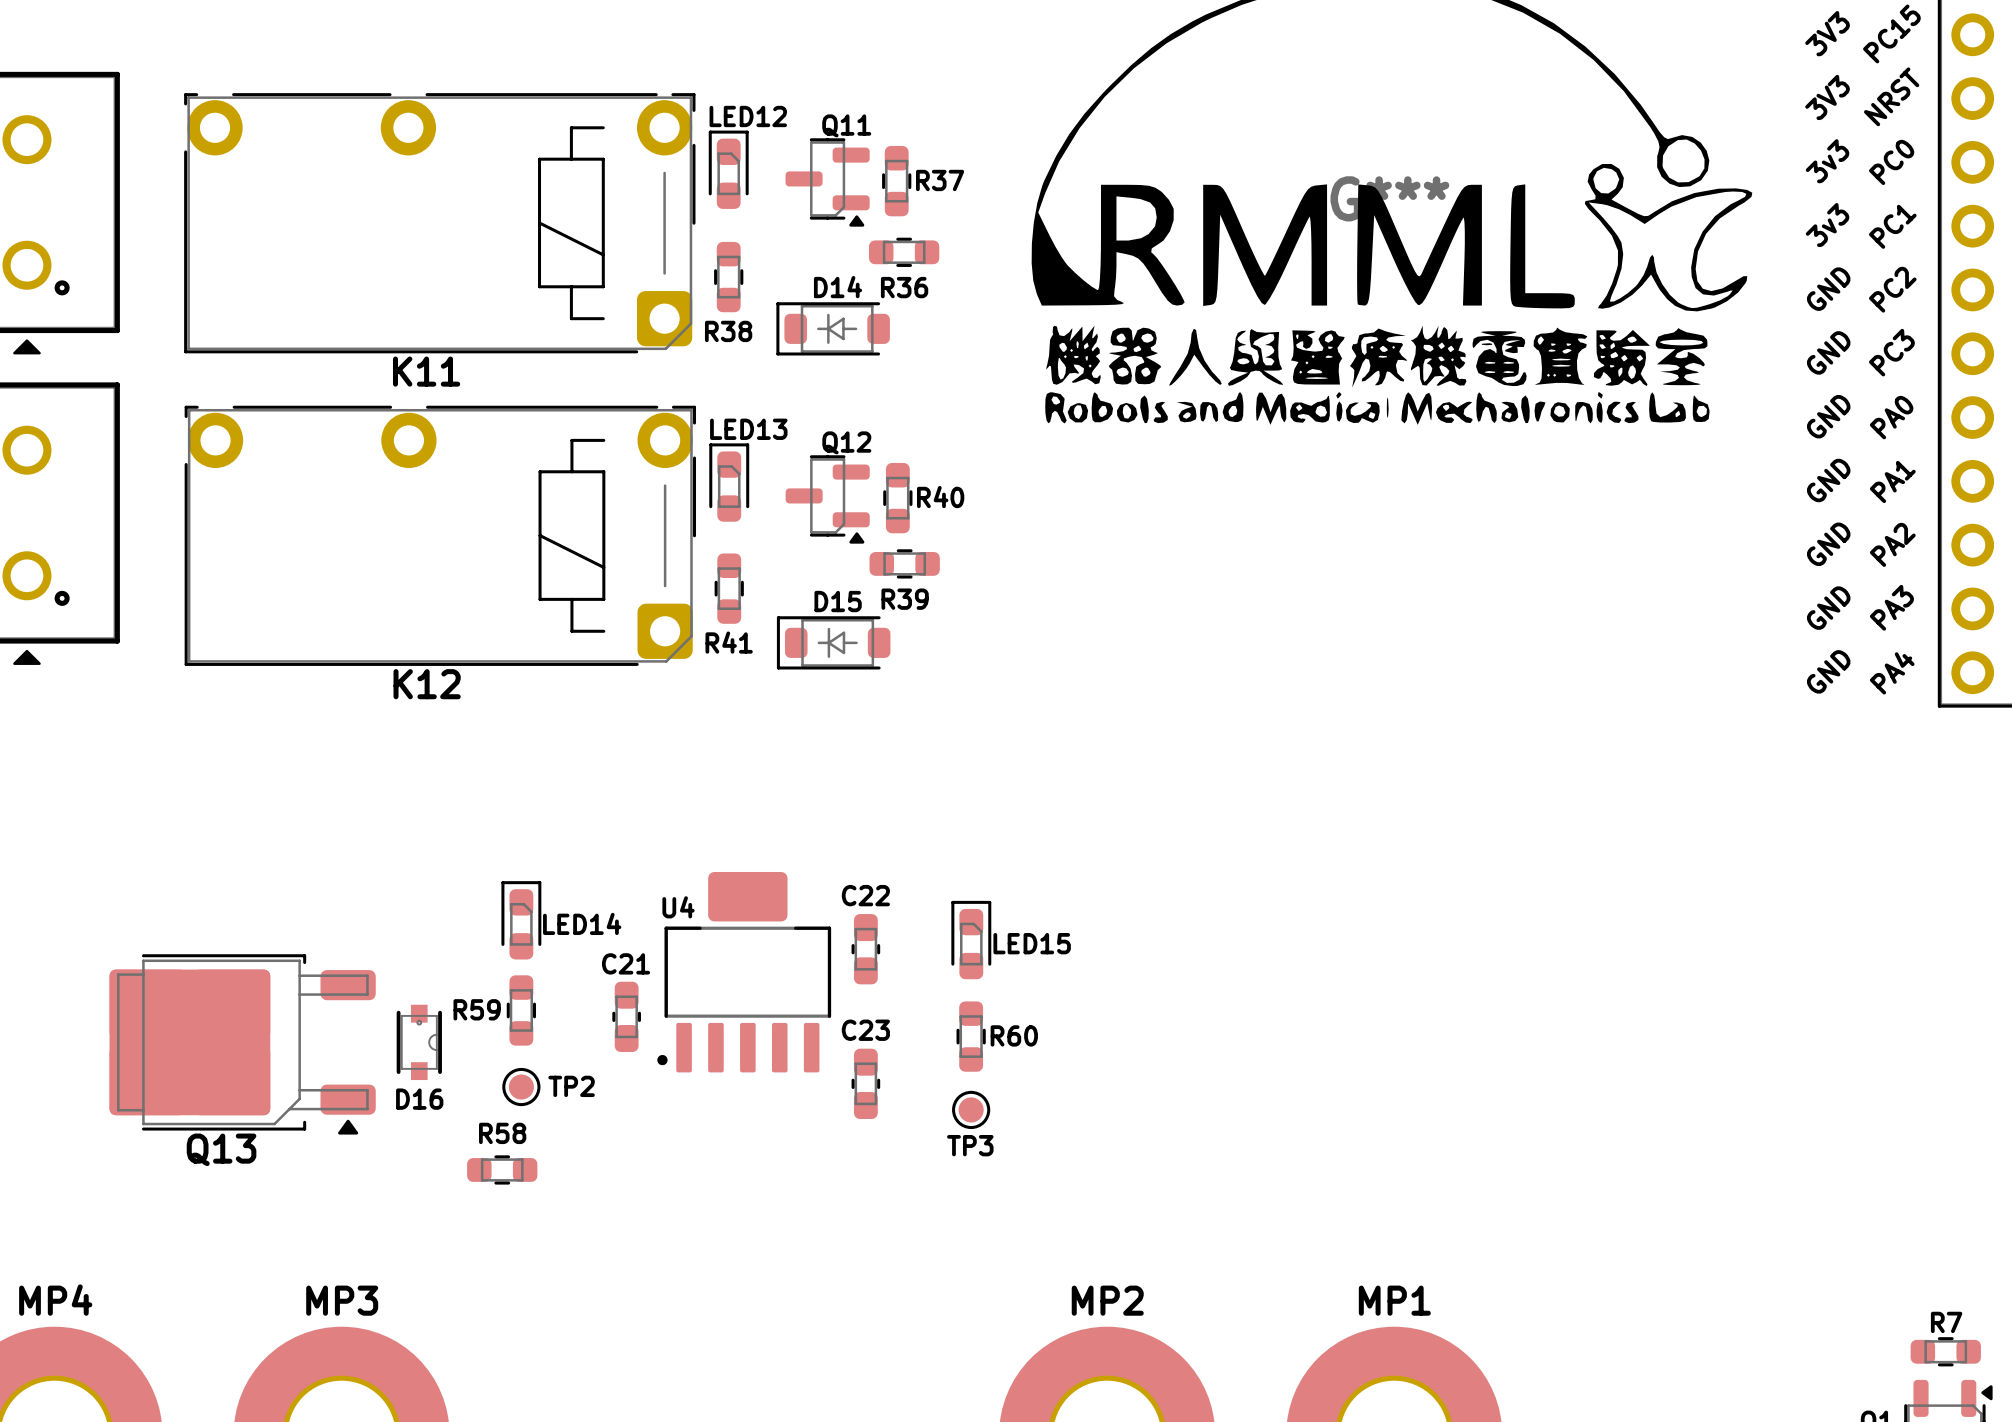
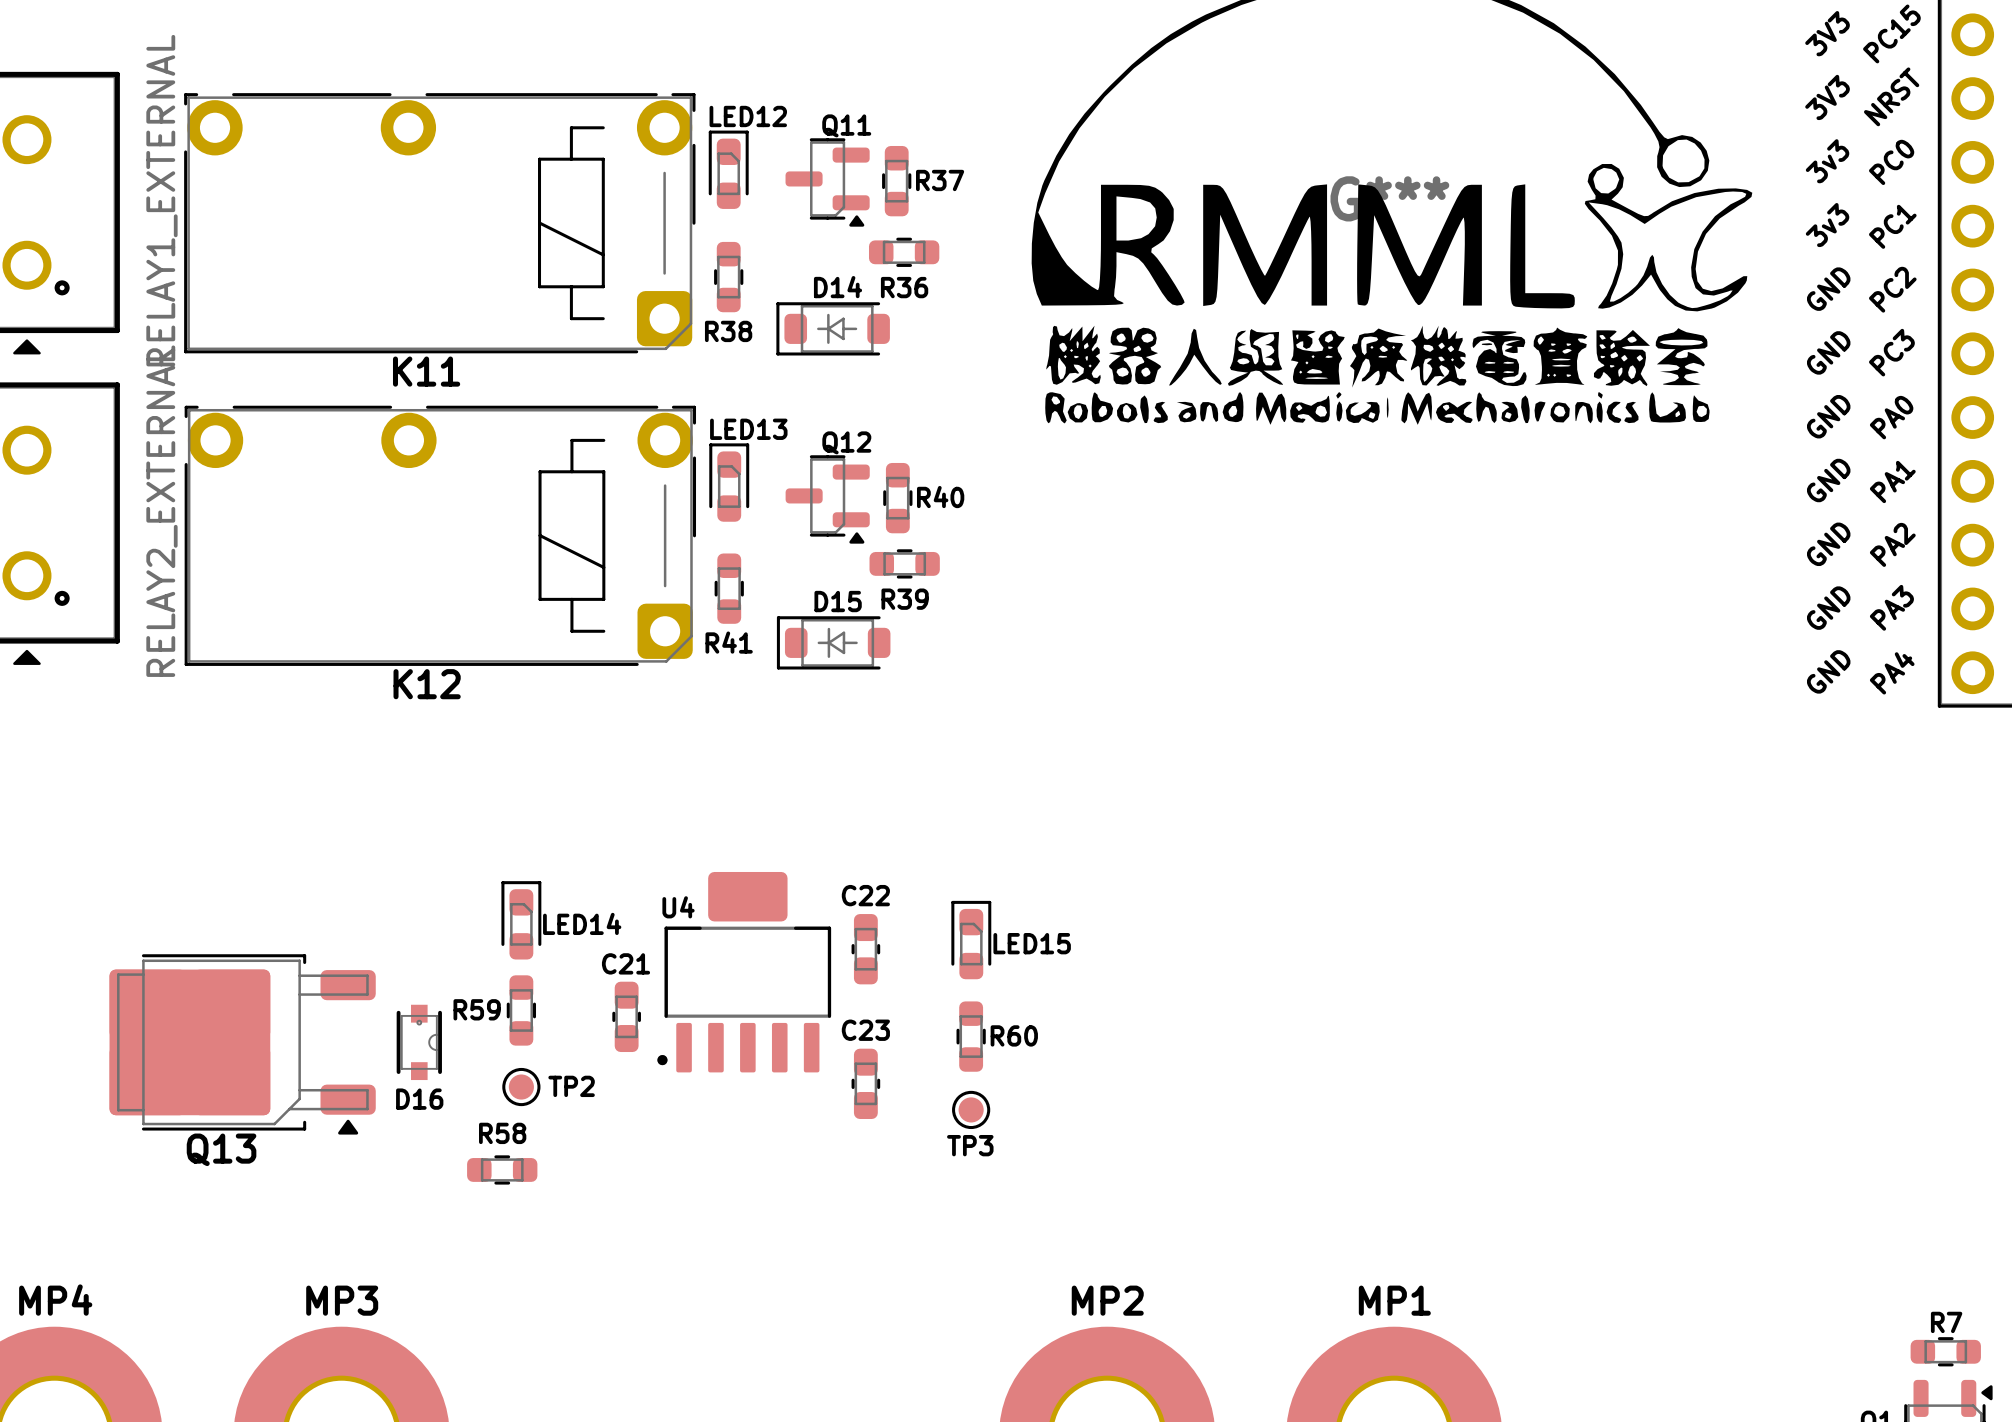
part value: none -> RELAY1_EXTERNAL (161, 200)
part value: none -> RELAY2_EXTERNAL (161, 511)

